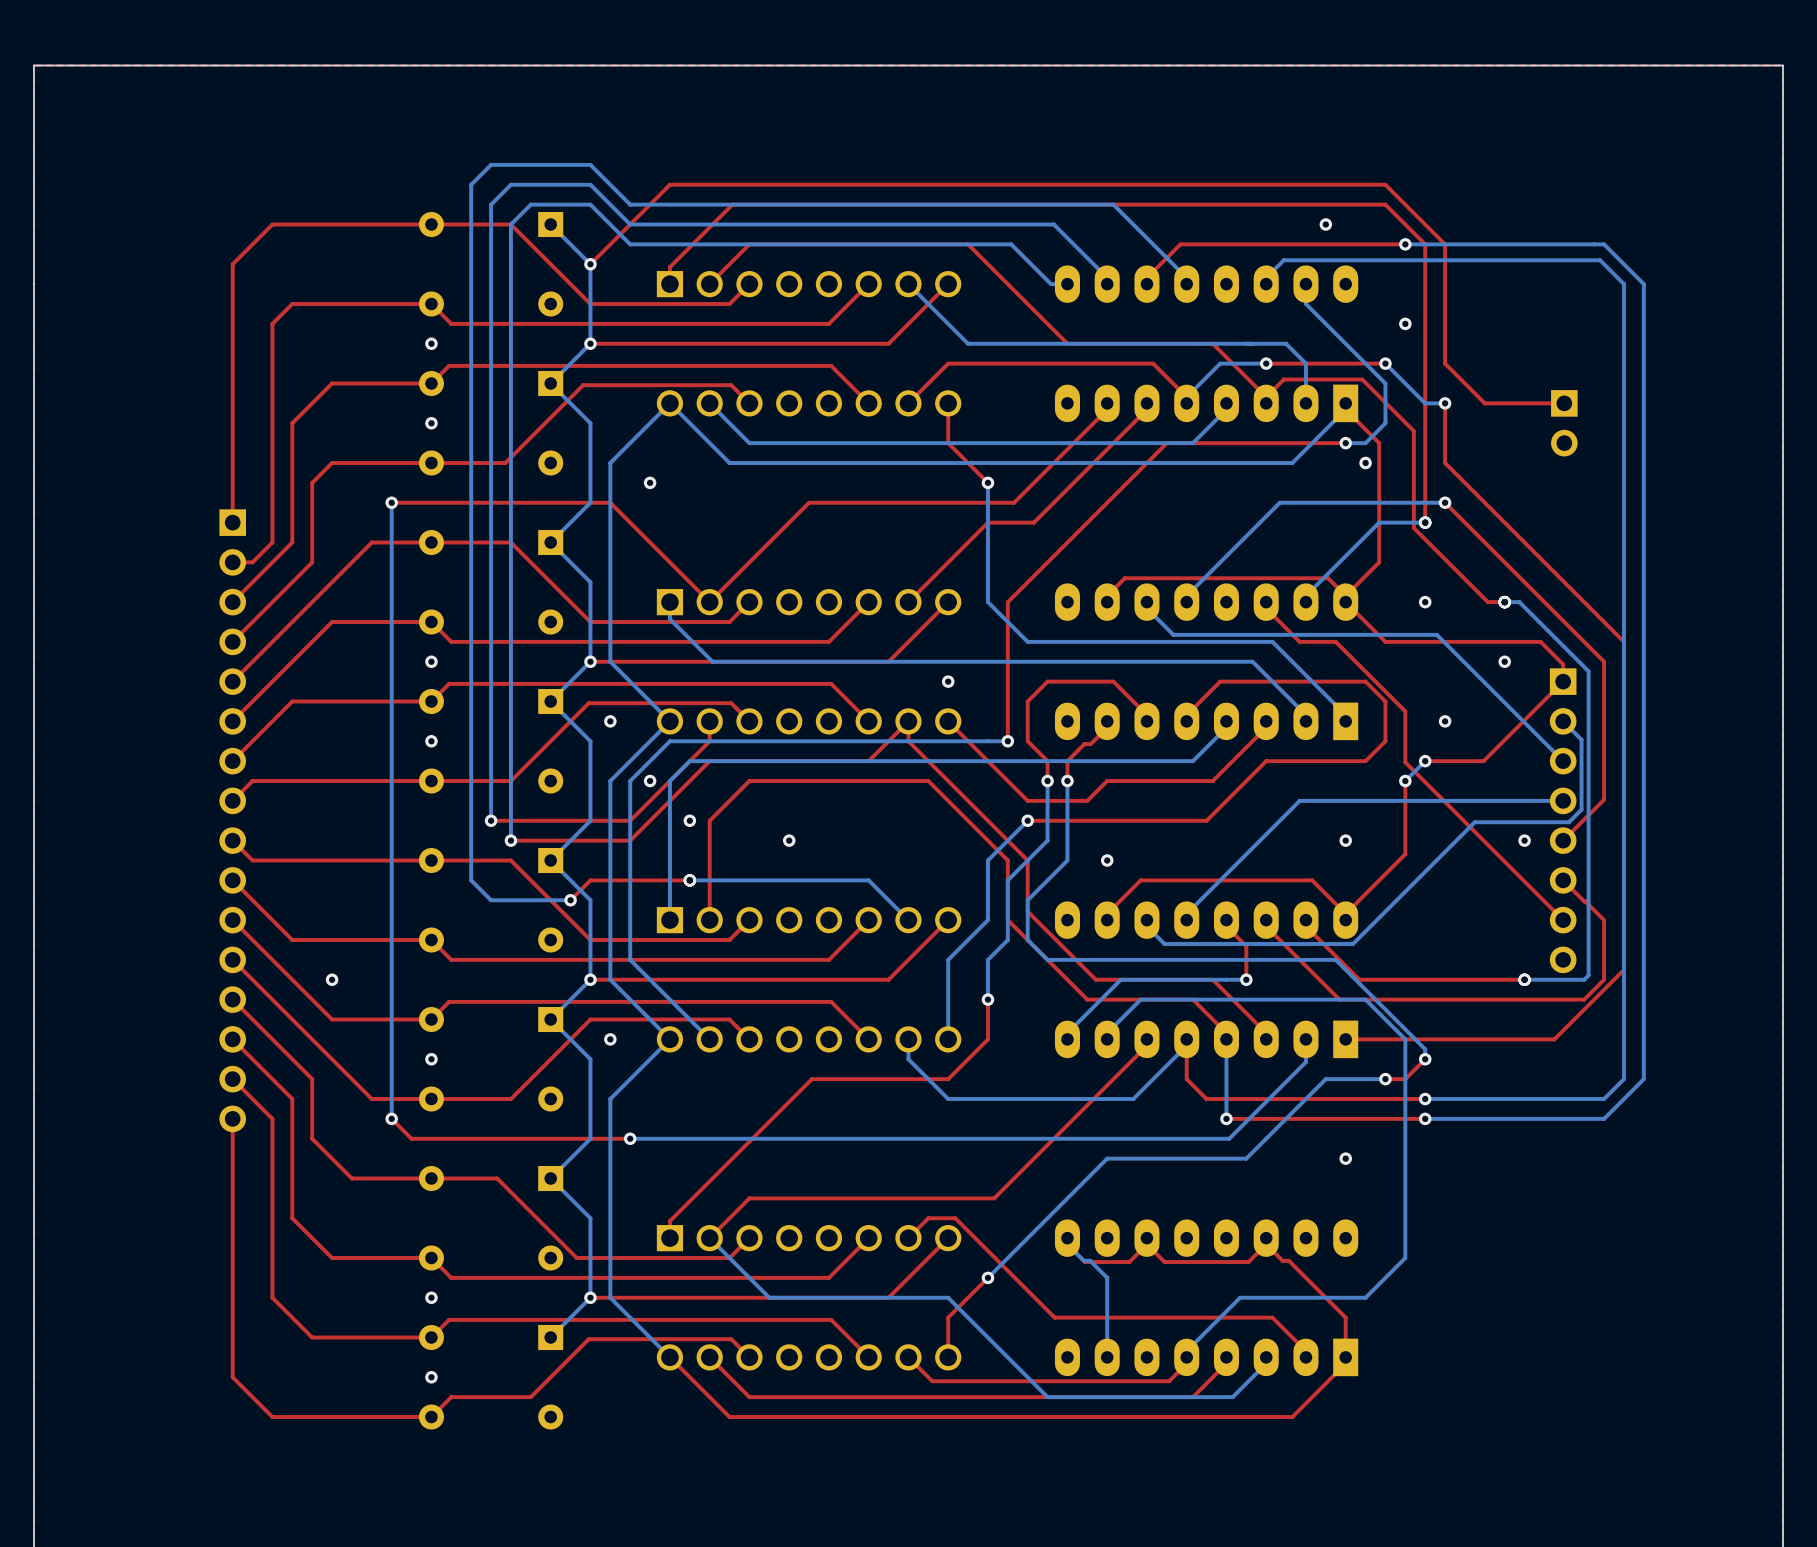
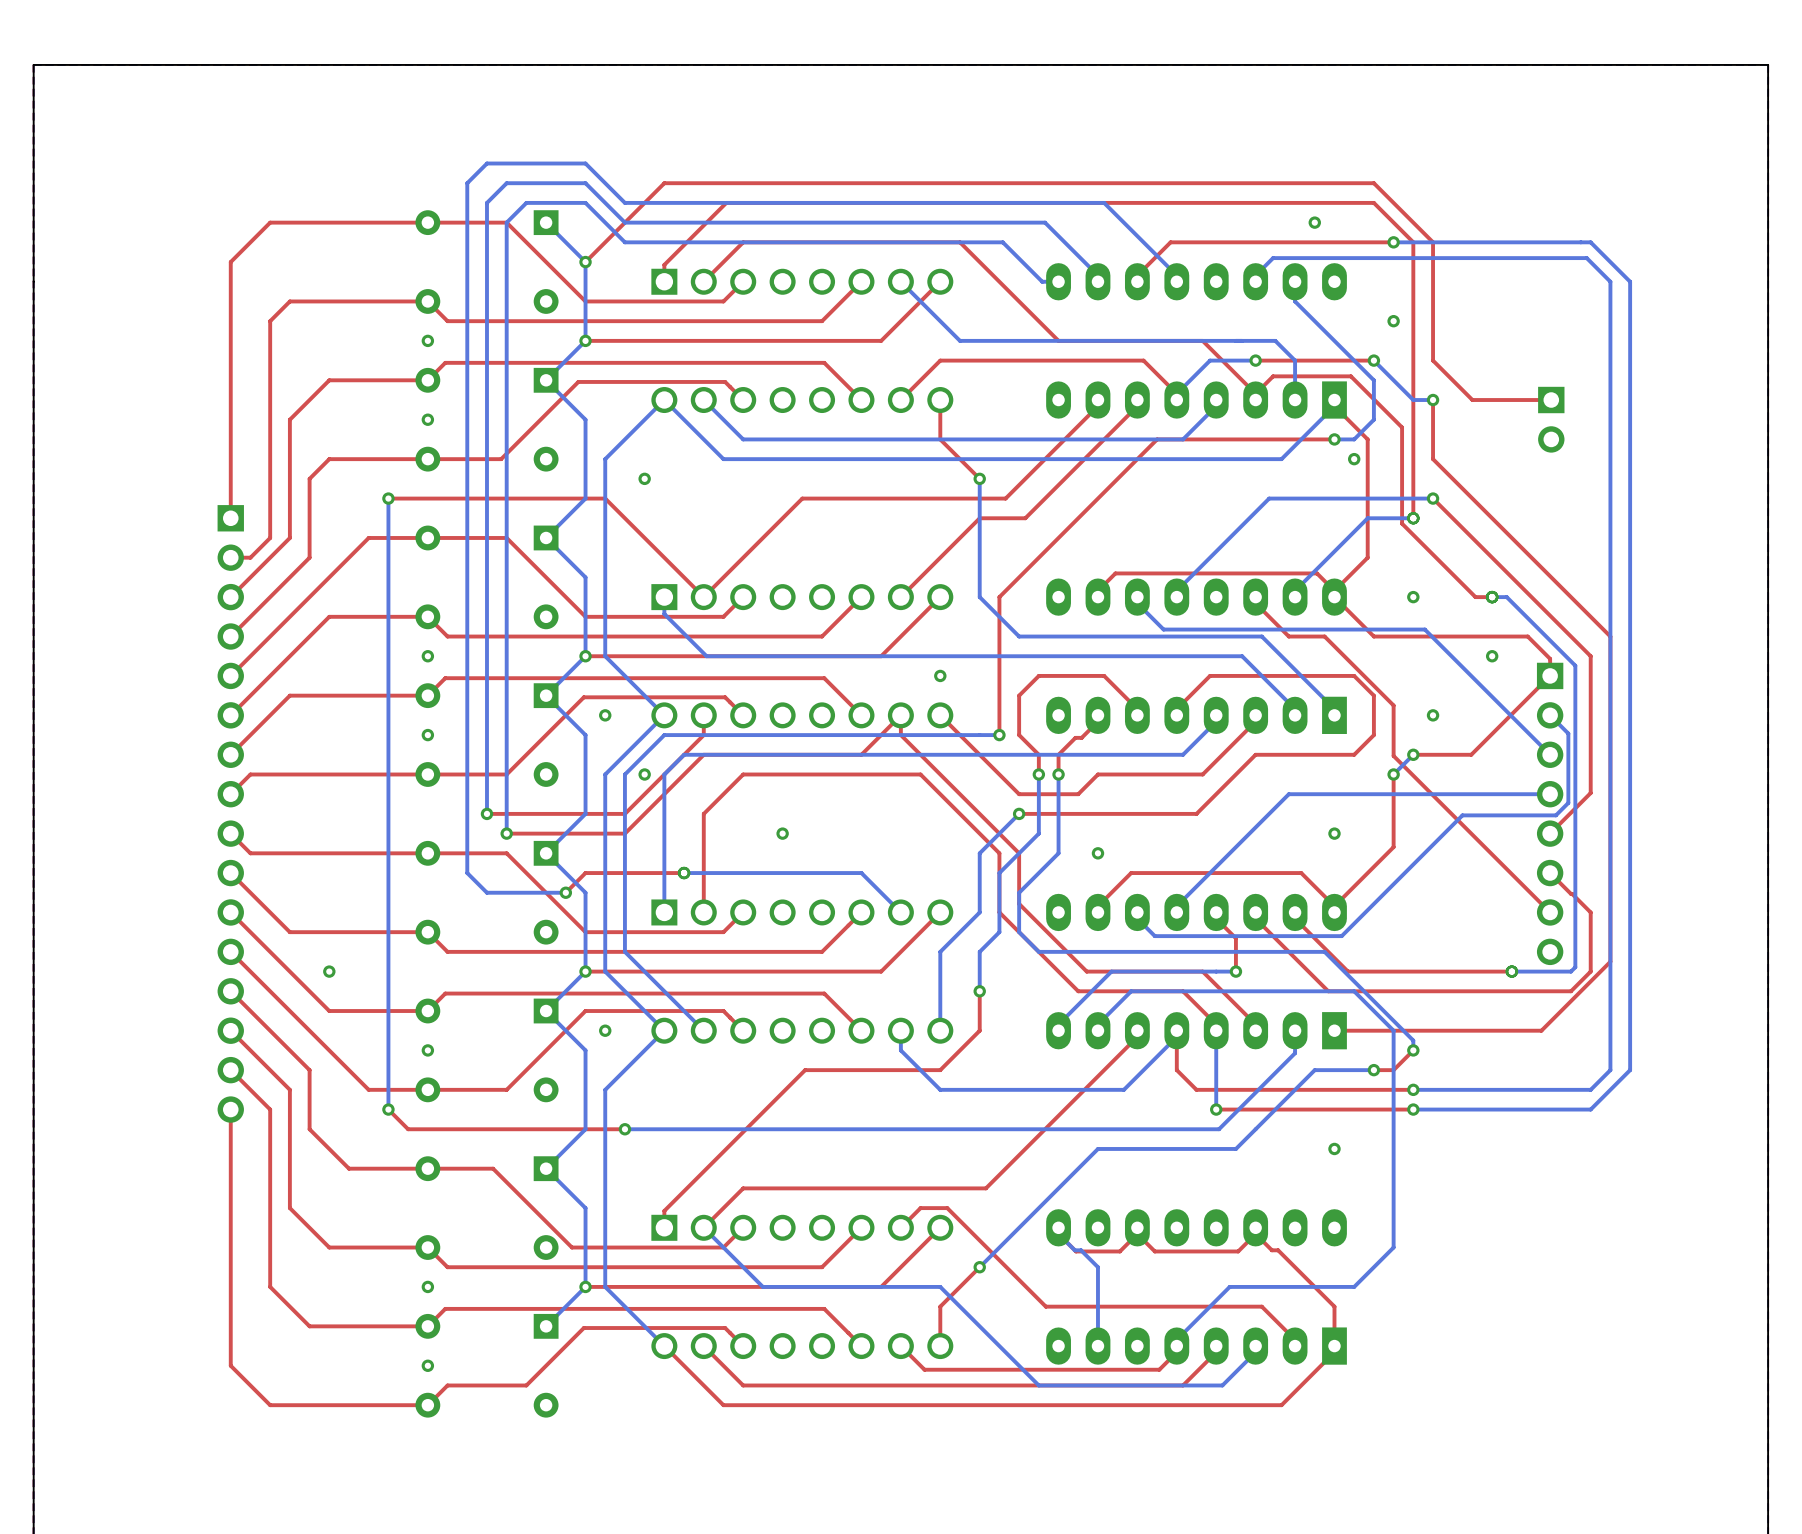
via: (689, 820) -> none
via: (1524, 840) -> none

